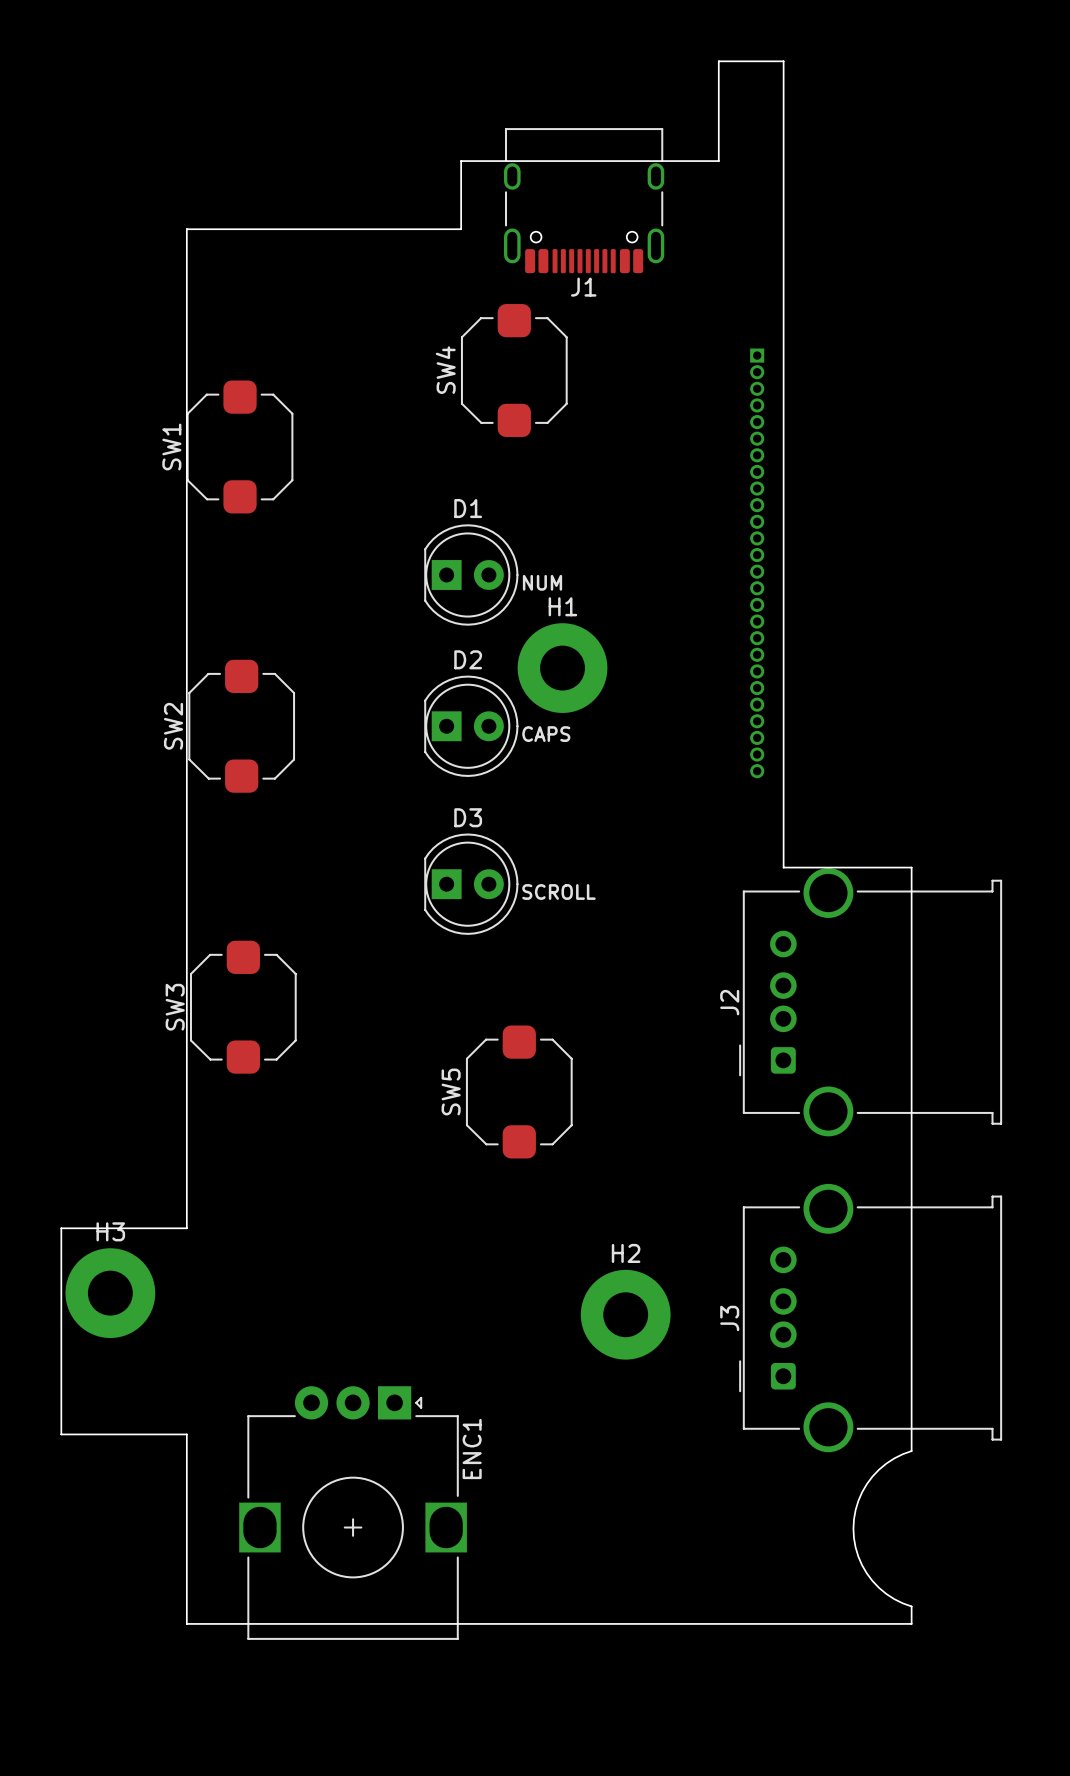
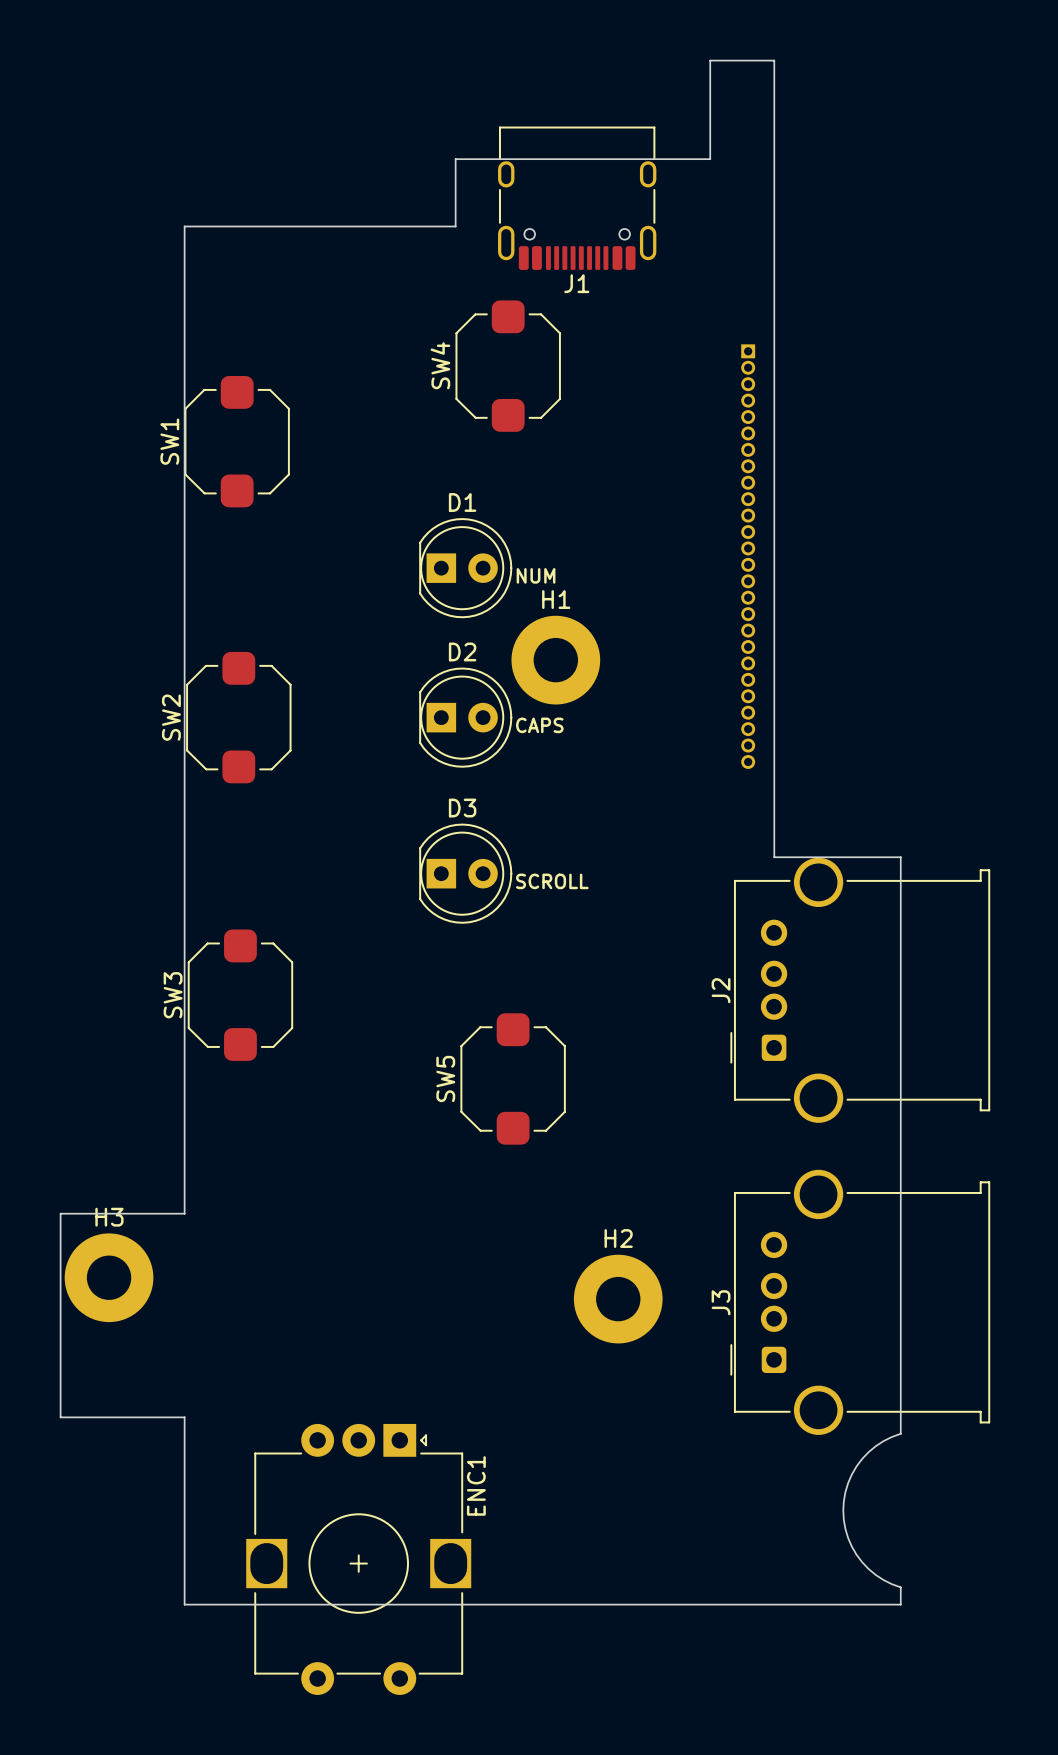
ENC1 footprint: [239, 1386, 467, 1640] -> [246, 1423, 472, 1695]

